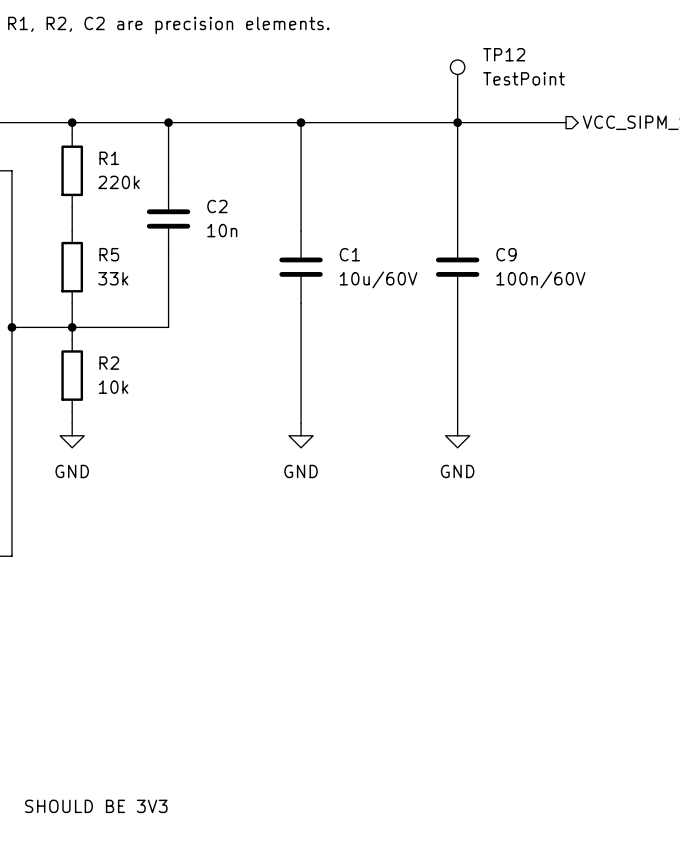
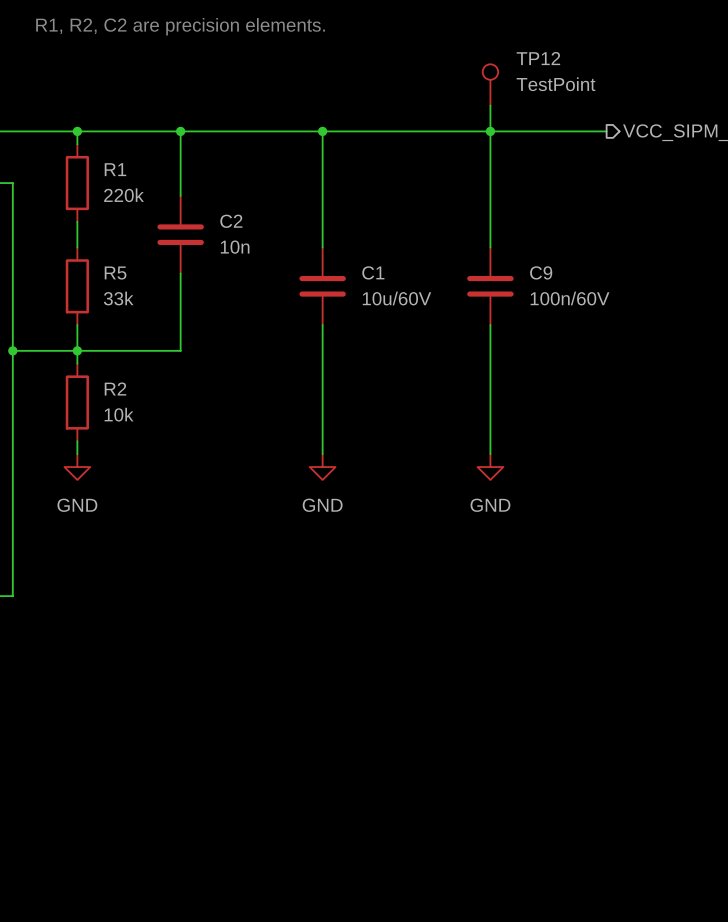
text: SHOULD BE 3V3 (96, 806) -> none

